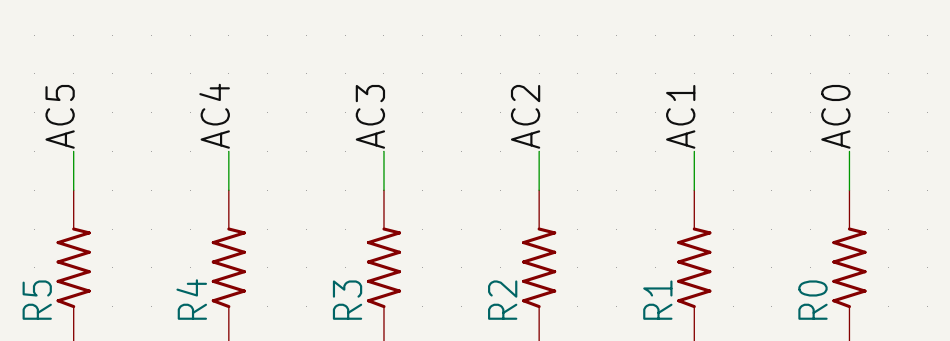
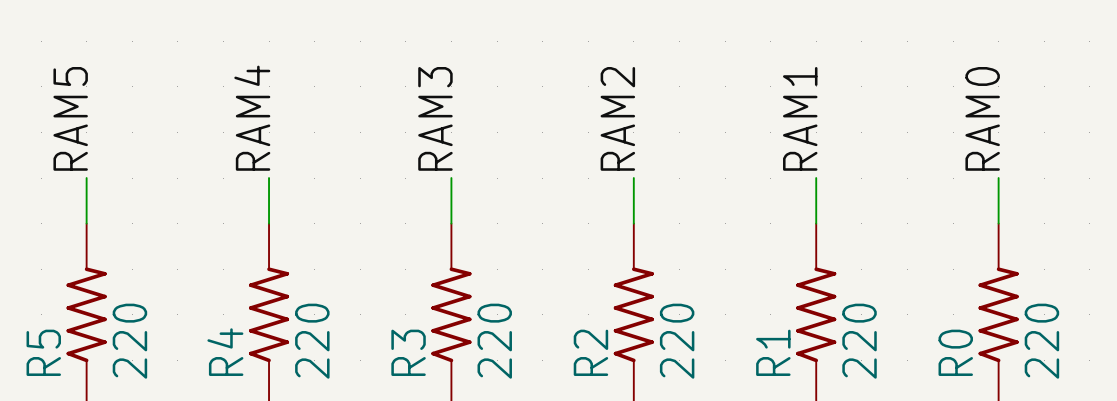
label: AC5 (60, 116) -> RAM5 (70, 118)
label: AC4 (214, 116) -> RAM4 (252, 118)
label: AC3 (370, 116) -> RAM3 (435, 118)
label: AC2 (525, 116) -> RAM2 (617, 118)
label: AC1 (680, 116) -> RAM1 (800, 118)
label: AC0 (835, 116) -> RAM0 (982, 118)
R5 value: none -> 220 (129, 341)
R4 value: none -> 220 (312, 341)
R3 value: none -> 220 (494, 341)
R2 value: none -> 220 (677, 341)
R1 value: none -> 220 (859, 341)
R0 value: none -> 220 (1041, 341)

